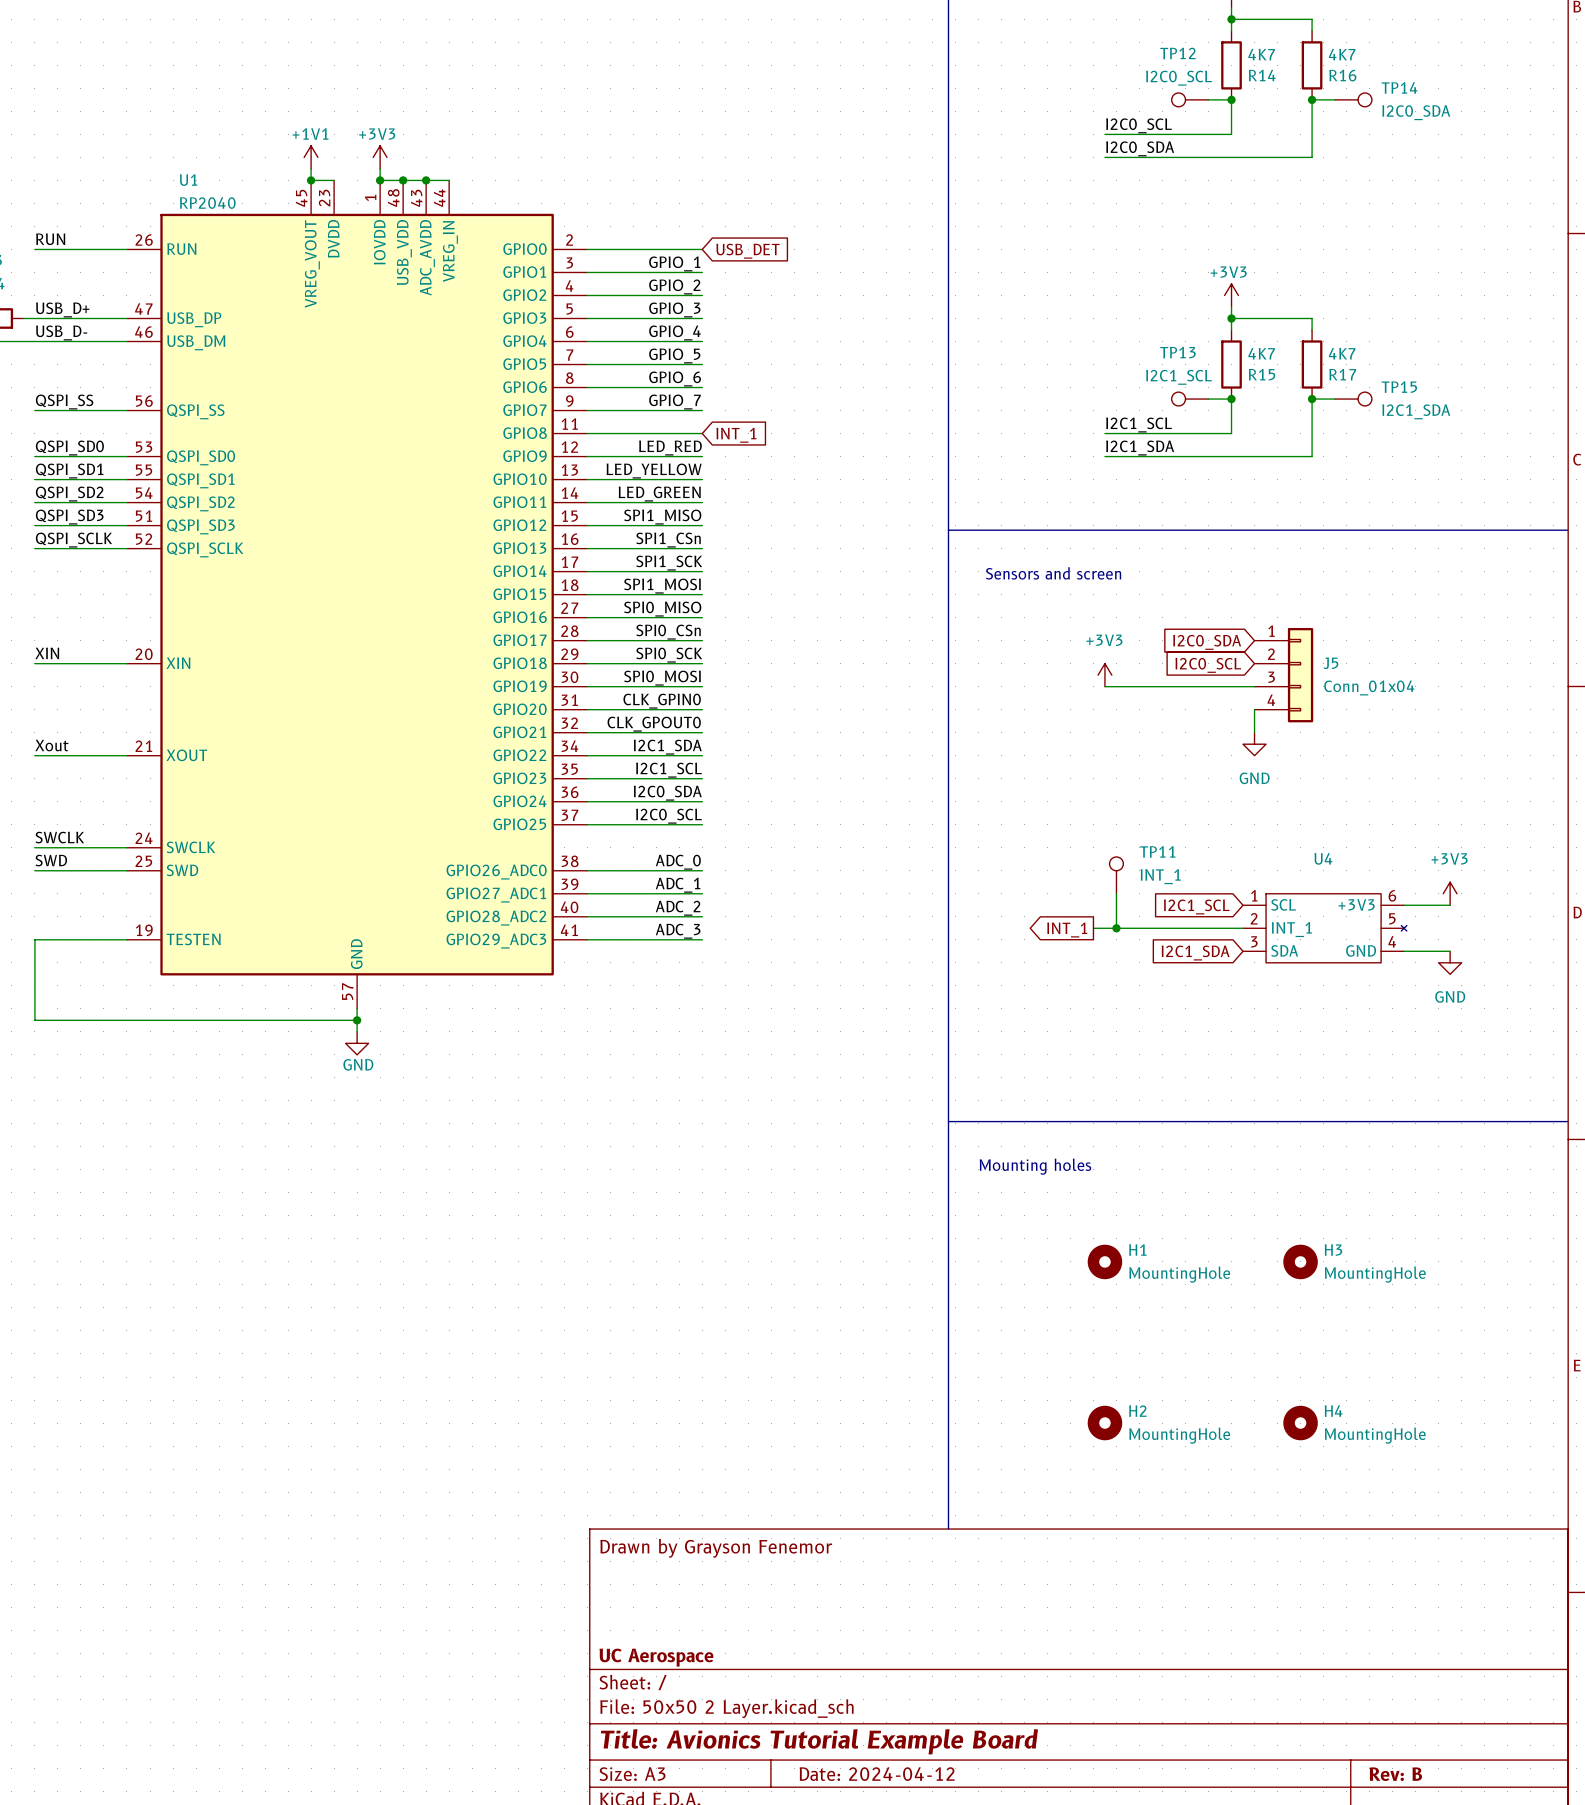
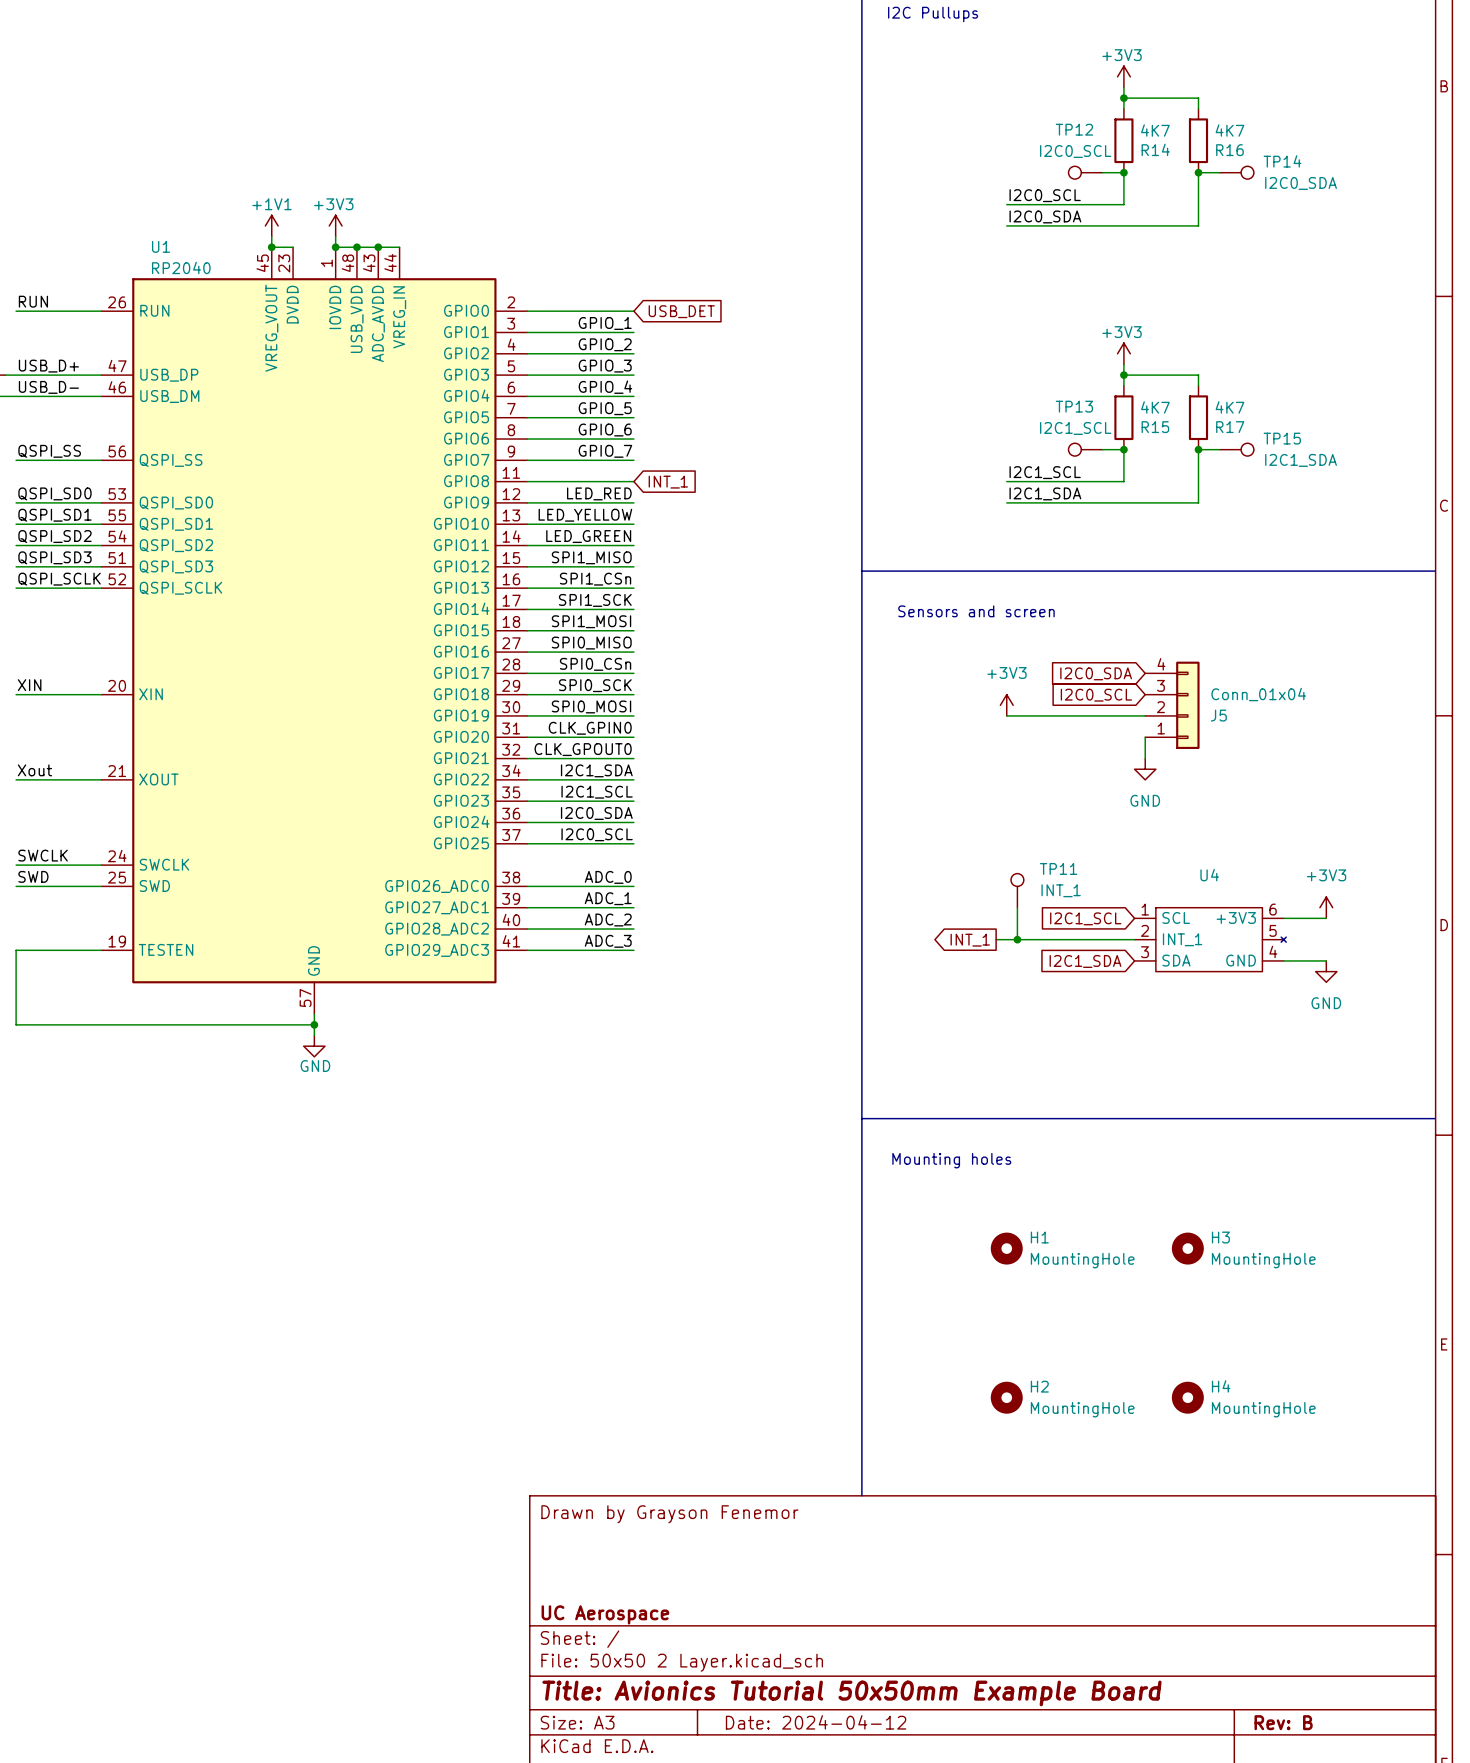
J5 flip: as is (1300, 675) -> up-down (1187, 705)
title block: Title: Avionics Tutorial Example Board (819, 1741) -> Title: Avionics Tutorial 50x50mm Example Board (851, 1693)

